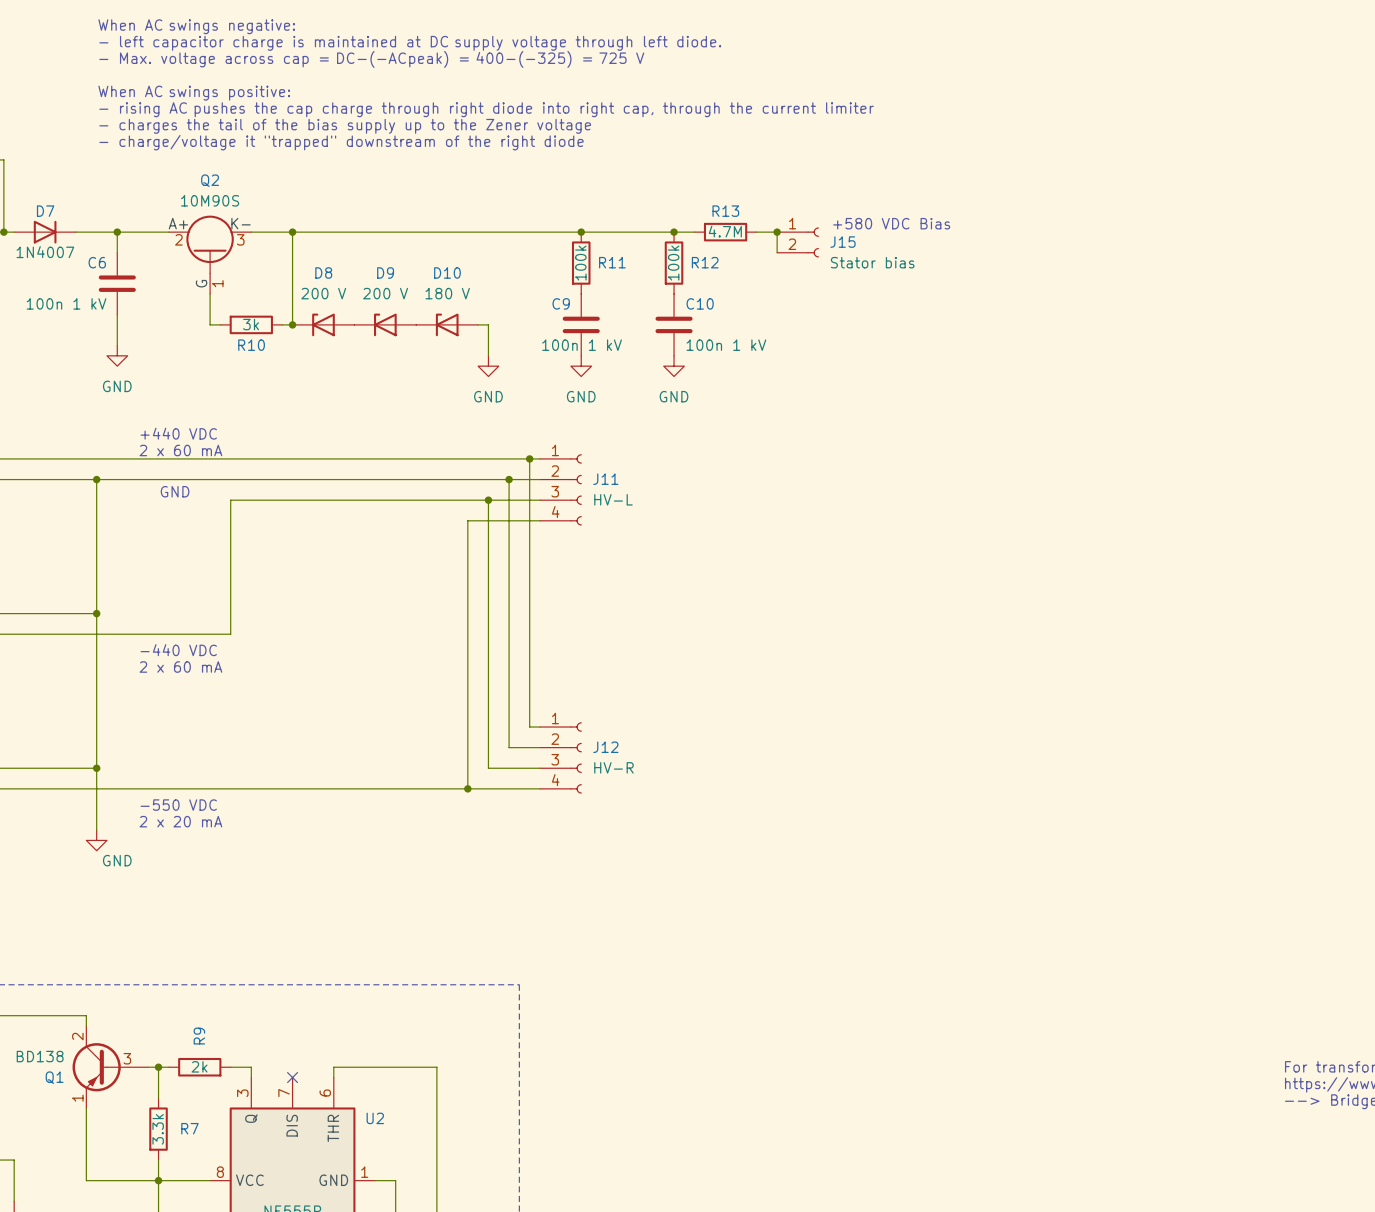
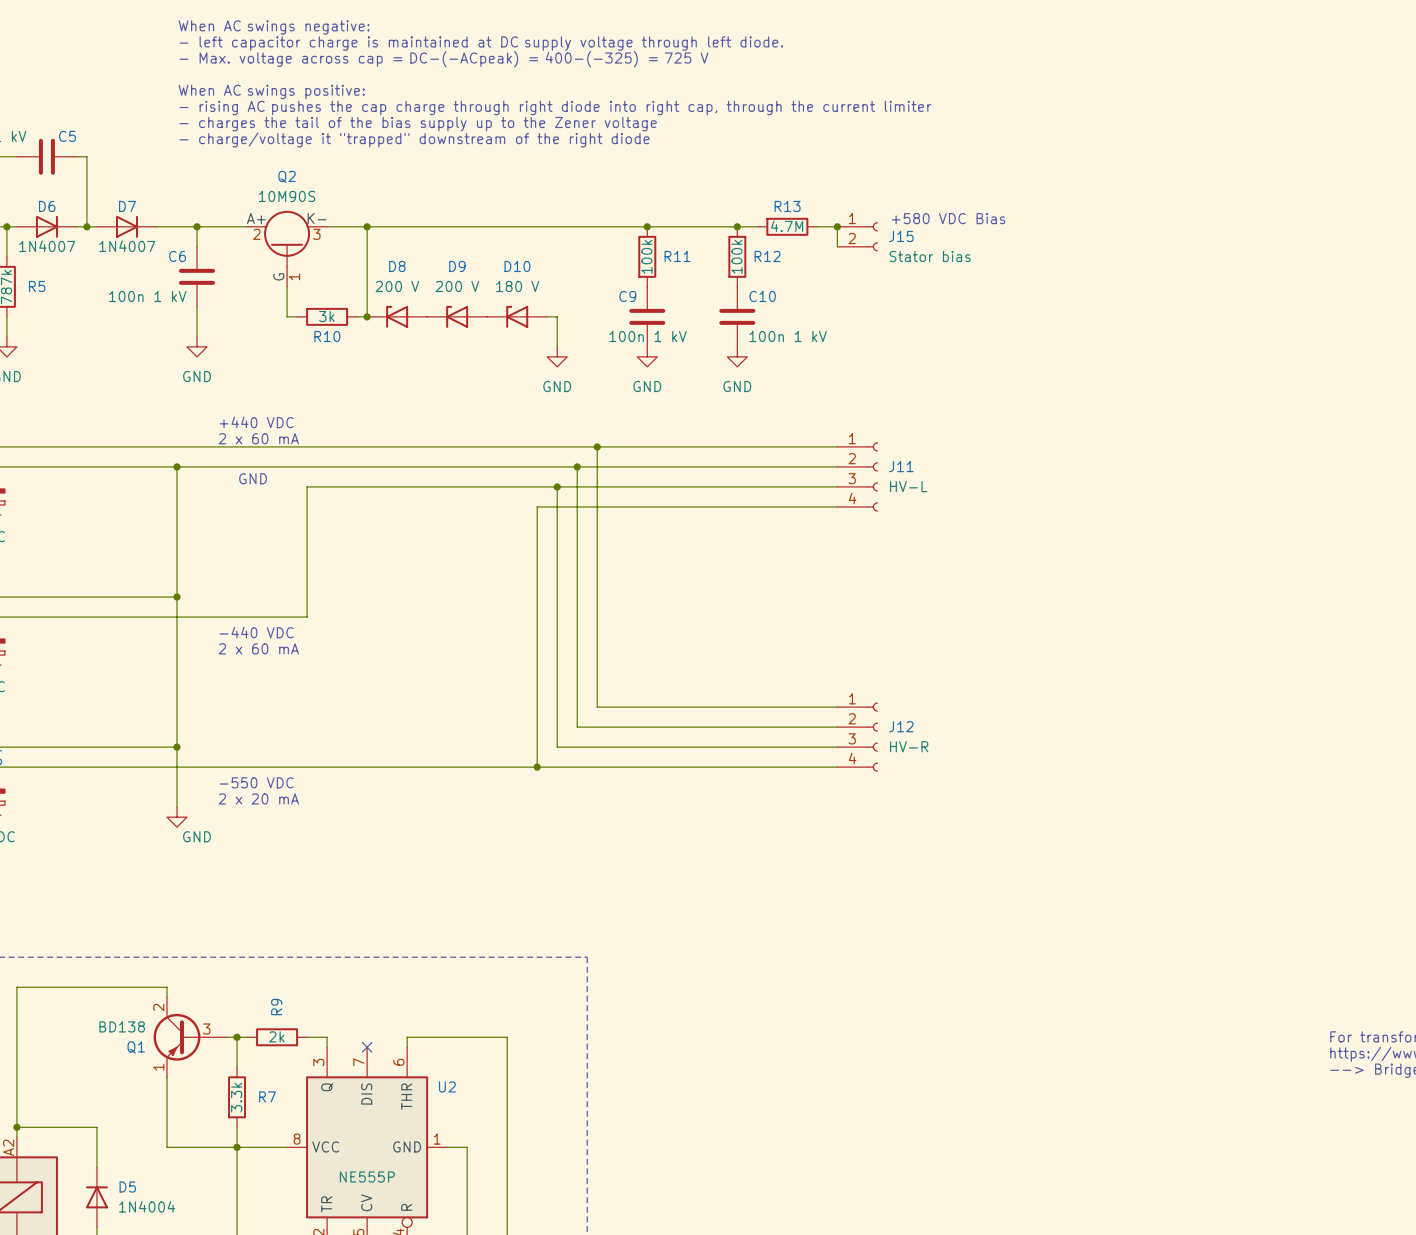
wire: none -> (607, 446) (837, 446)
wire: none -> (607, 466) (837, 466)
J11 position: (560, 489) -> (857, 476)
wire: none -> (607, 486) (837, 486)
wire: none -> (607, 506) (837, 506)
wire: none -> (607, 707) (837, 707)
wire: none -> (607, 727) (837, 727)
J12 position: (560, 757) -> (857, 737)
wire: none -> (607, 747) (837, 747)
wire: none -> (607, 767) (837, 767)

